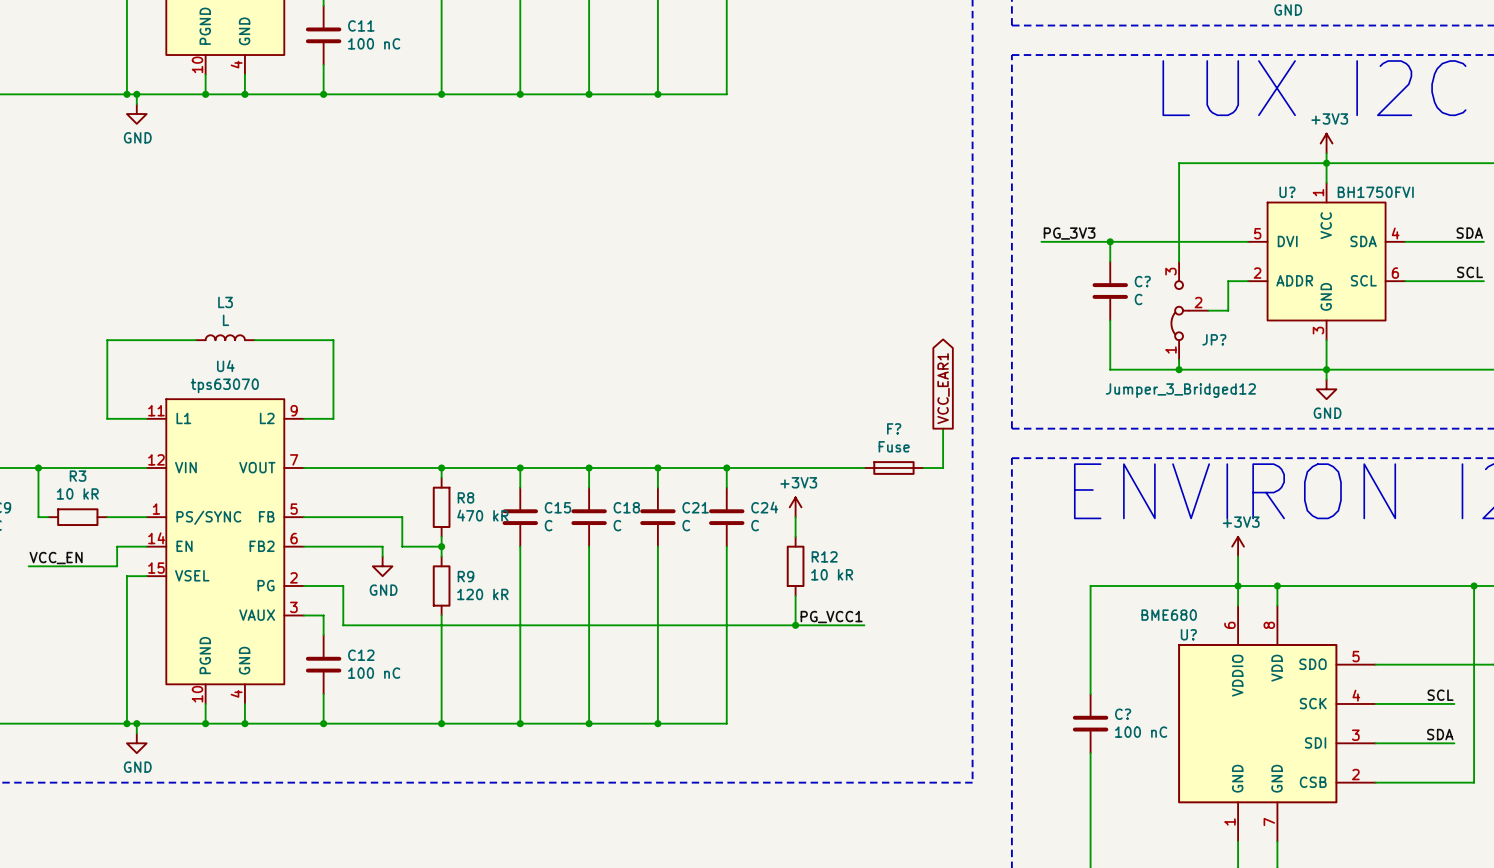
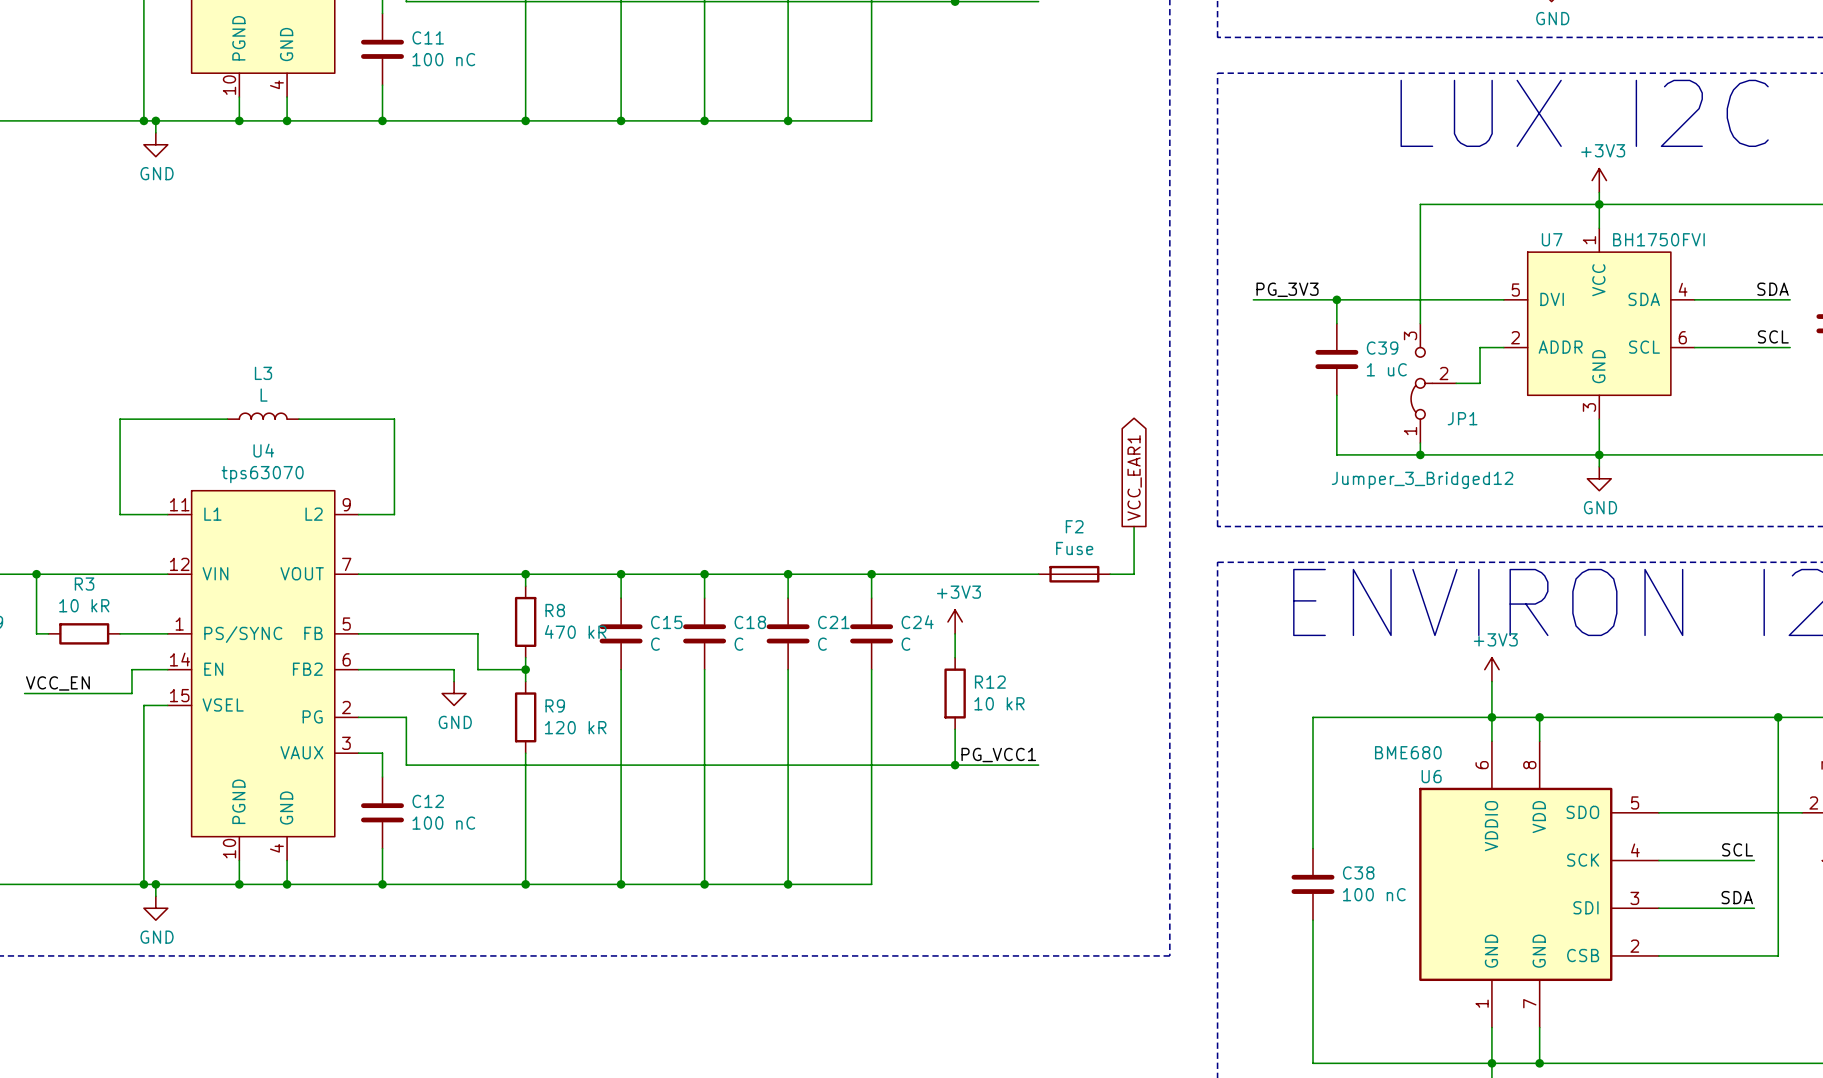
U? name: U? (1287, 192) -> U7 (1552, 239)
C? name: C? (1142, 281) -> C39 (1382, 348)
C? value: C (1138, 299) -> 1 uC (1386, 369)
JP? name: JP? (1214, 339) -> JP1 (1462, 418)
F? name: F? (894, 428) -> F2 (1074, 526)
U? name: U? (1188, 634) -> U6 (1431, 776)
C? name: C? (1123, 714) -> C38 (1358, 872)

